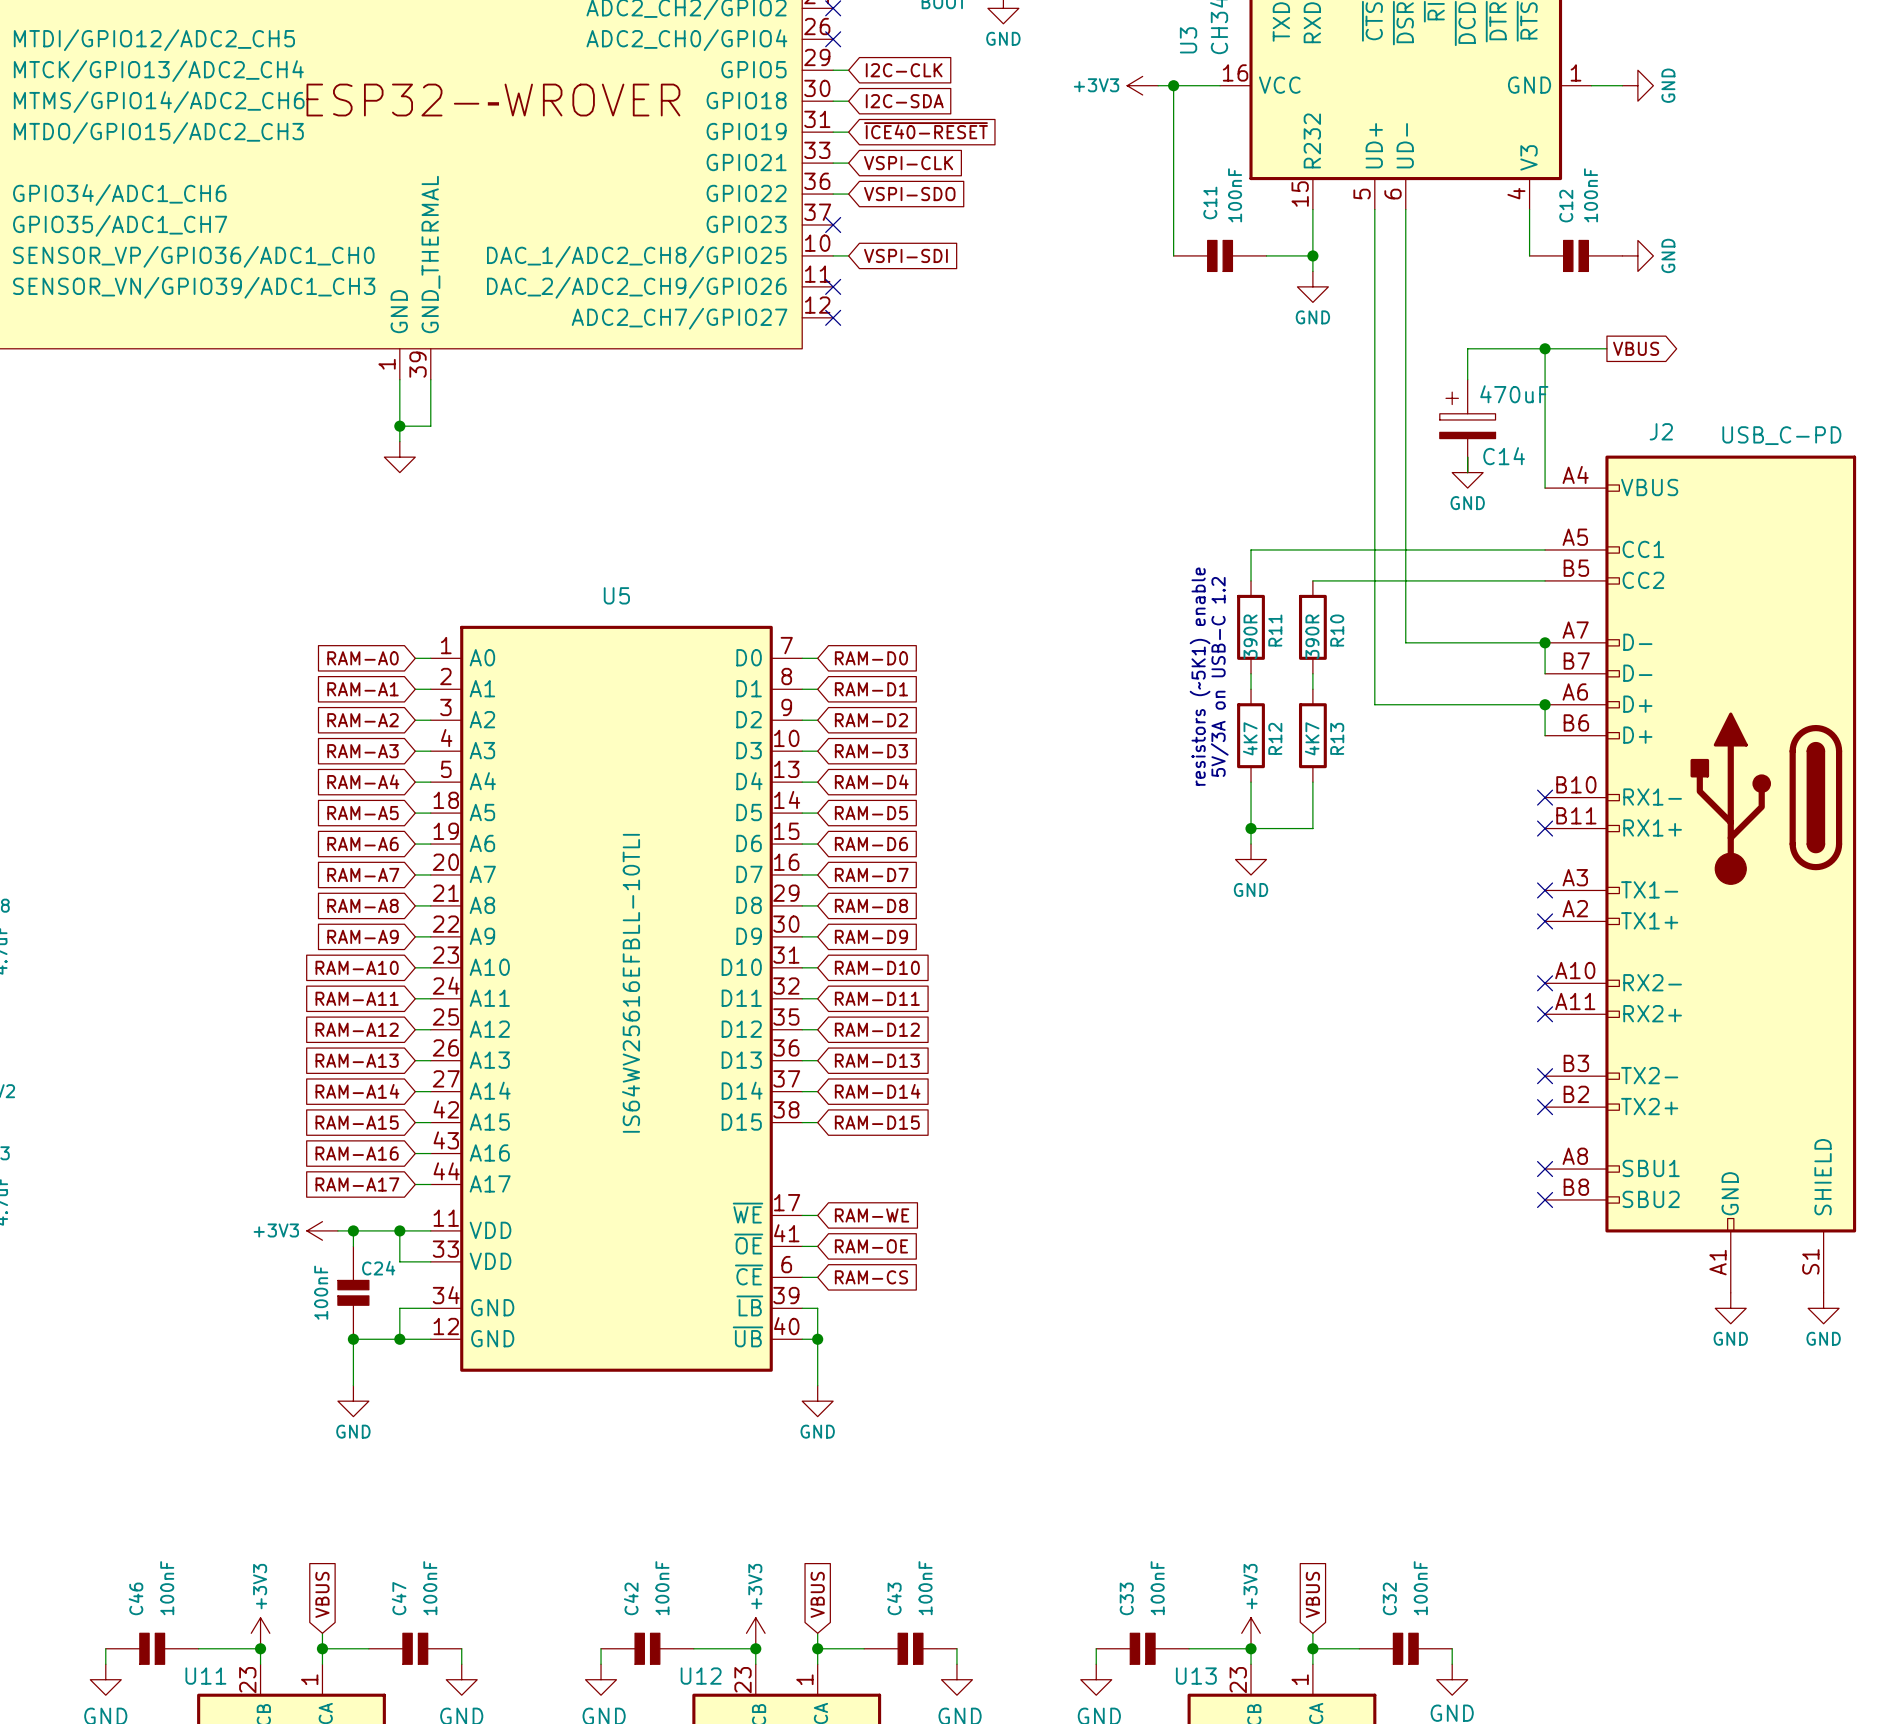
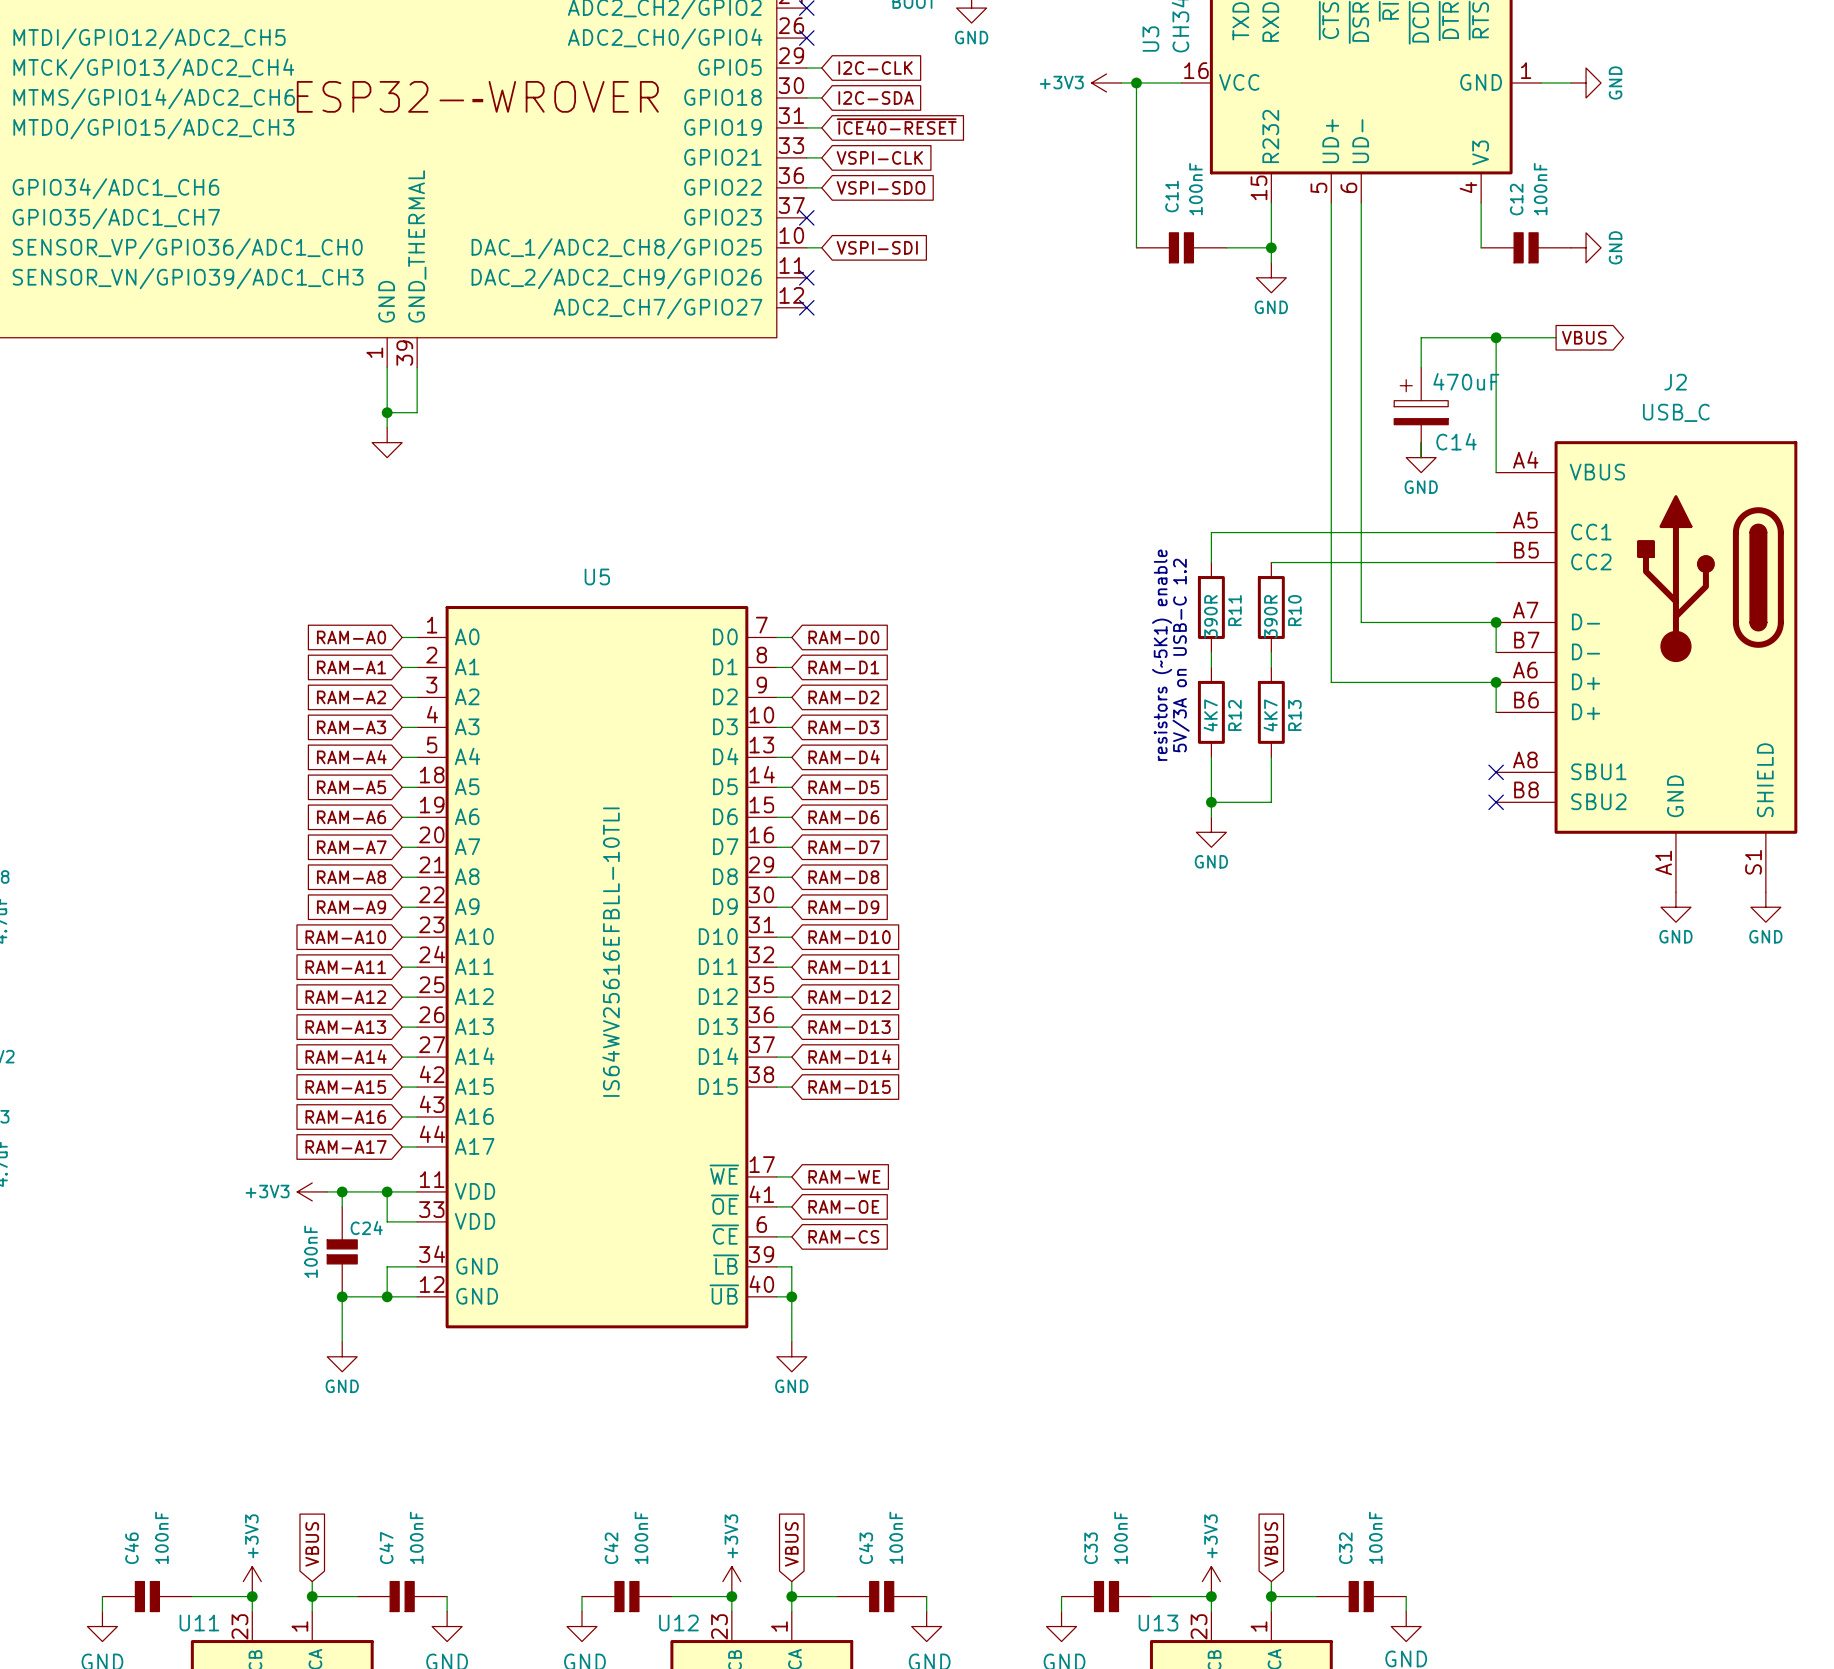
J2 name position: J2 (1661, 431) -> J2 (1675, 382)
J2 value: USB_C-PD (1781, 435) -> USB_C (1676, 412)
J2 symbol: [1545, 455, 1857, 1293] -> [1496, 441, 1798, 893]
no-connect mark: (1545, 890) -> none
no-connect mark: (1545, 921) -> none
power symbol: none -> GND (1675, 907)
power symbol: none -> GND (1765, 907)
no-connect mark: (1545, 983) -> none
no-connect mark: (1545, 1014) -> none
no-connect mark: (1545, 1076) -> none
no-connect mark: (1545, 1107) -> none
no-connect mark: (1545, 1169) -> none
no-connect mark: (1545, 1199) -> none
power symbol: GND (1730, 1308) -> none
power symbol: GND (1823, 1308) -> none

